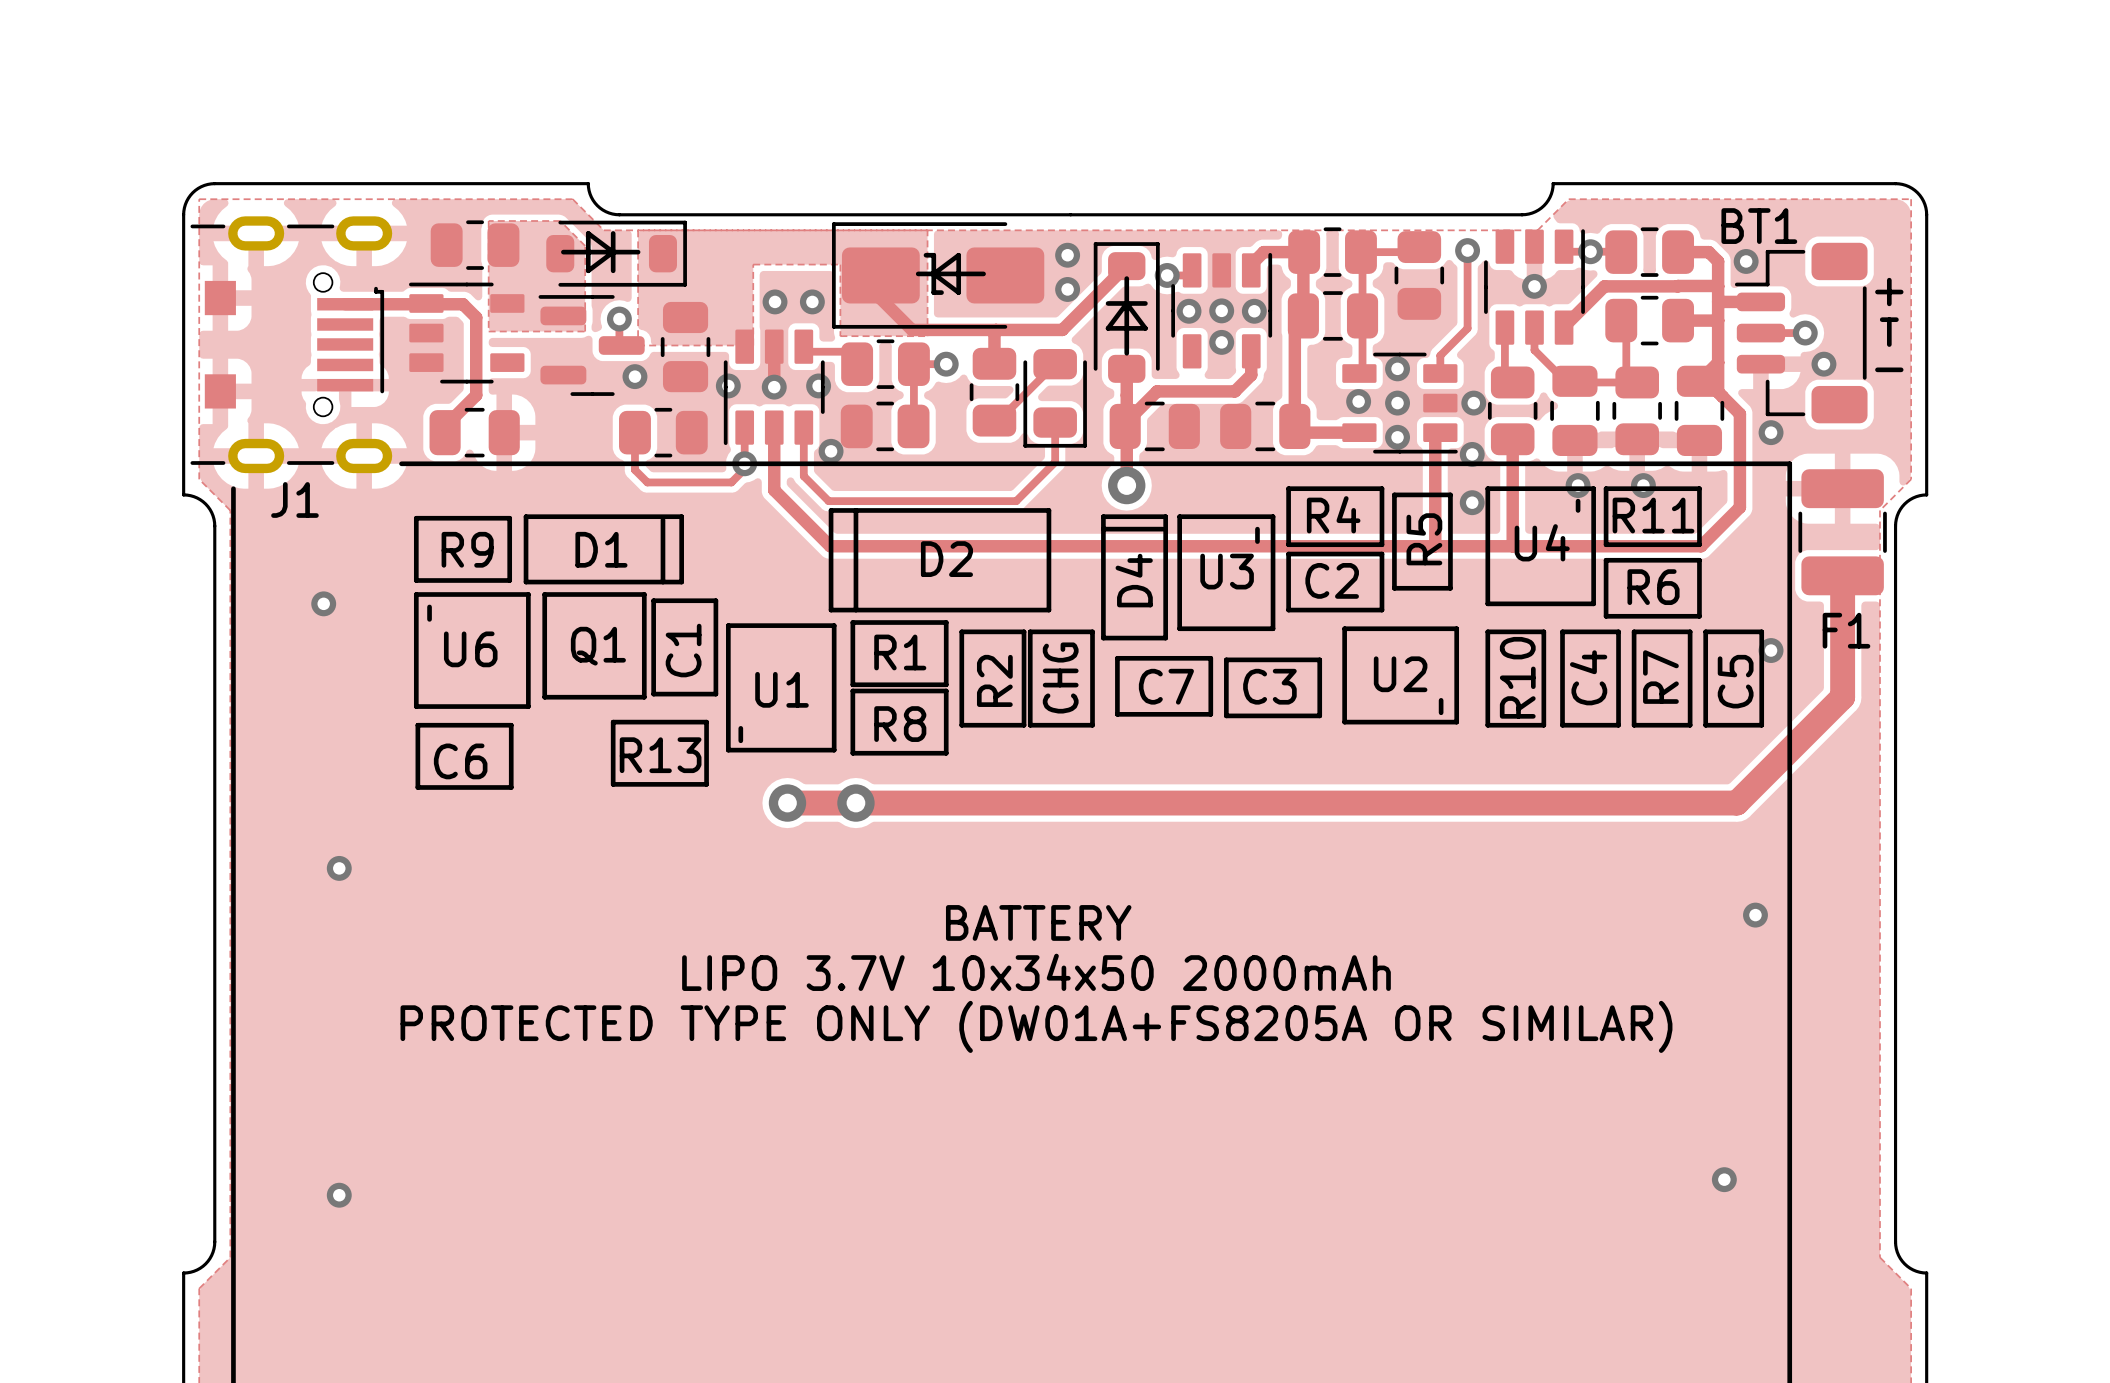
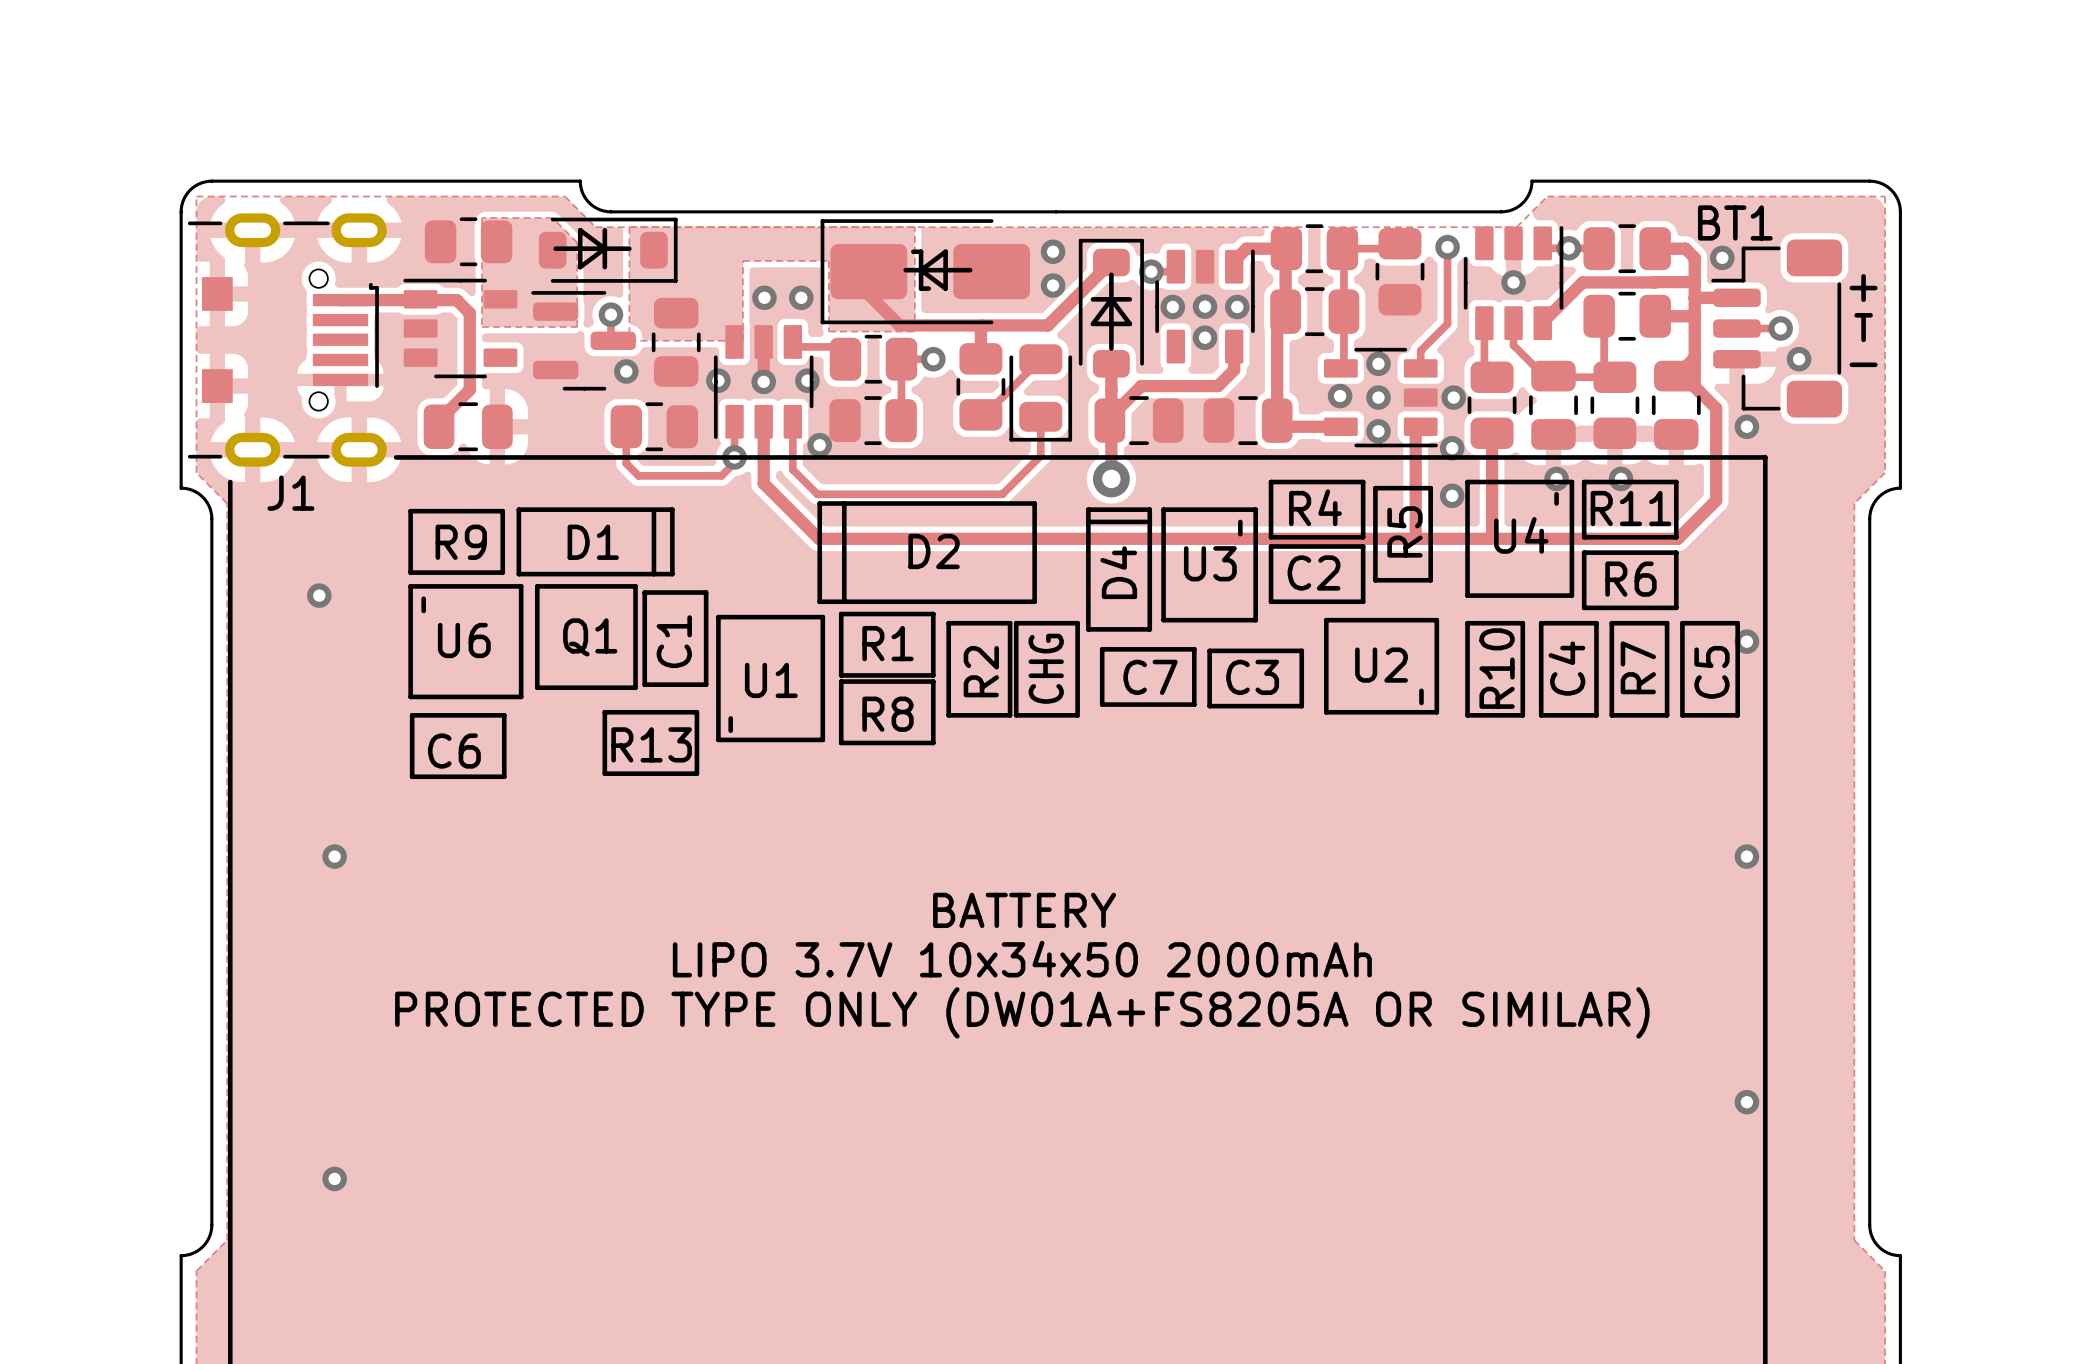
F1: (1842, 532) -> none
track: (1842, 575) (1842, 697) (1736, 803) (787, 803) -> none
via: (787, 803) -> none
via: (855, 803) -> none
via position: (1755, 915) -> (1746, 856)
via position: (1724, 1179) -> (1746, 1102)

